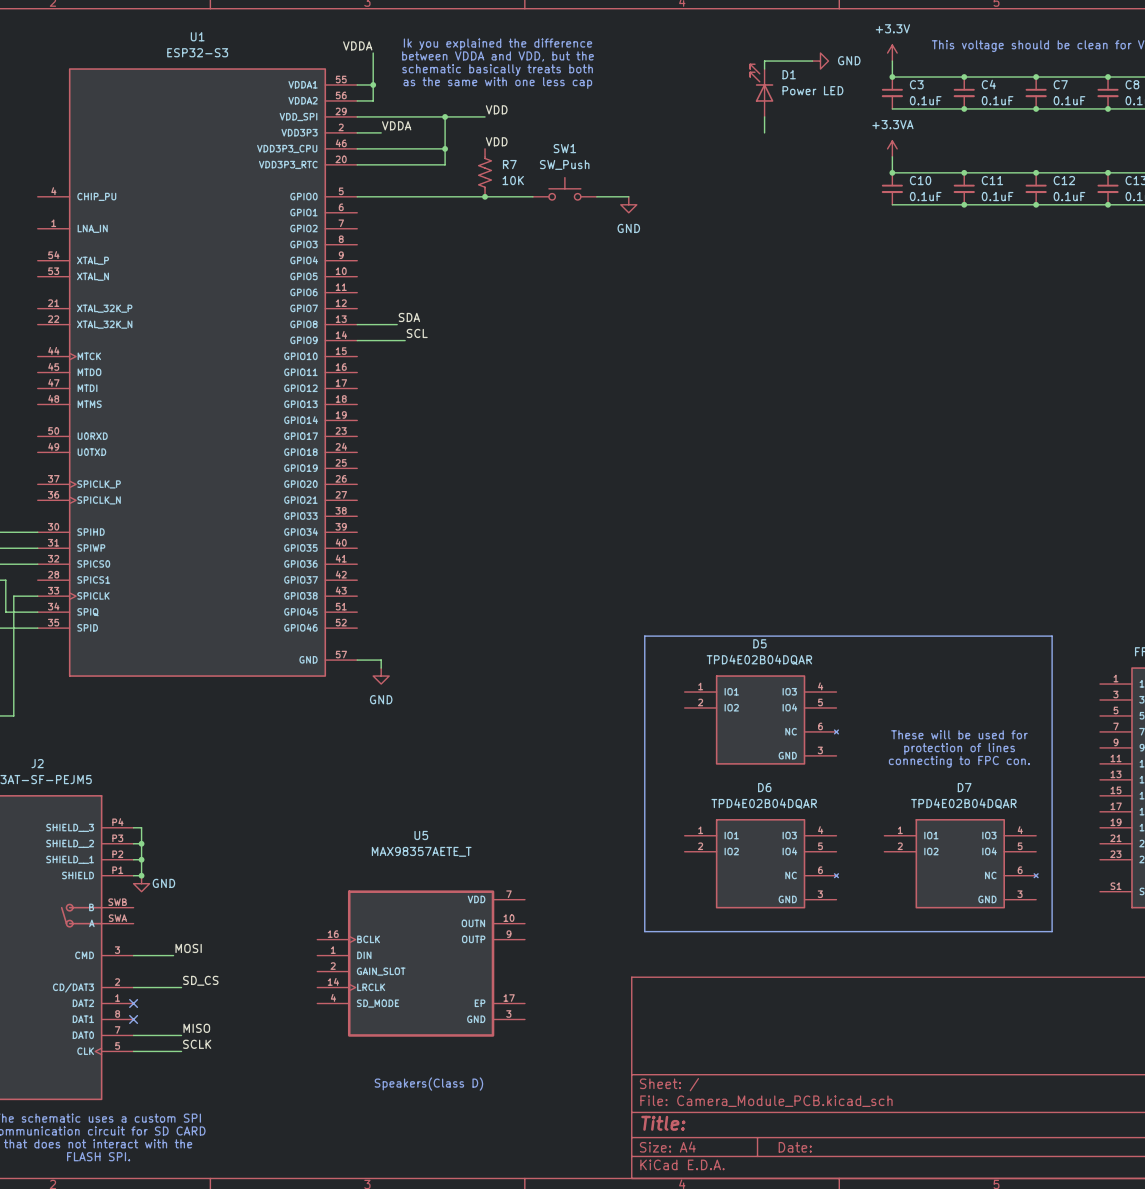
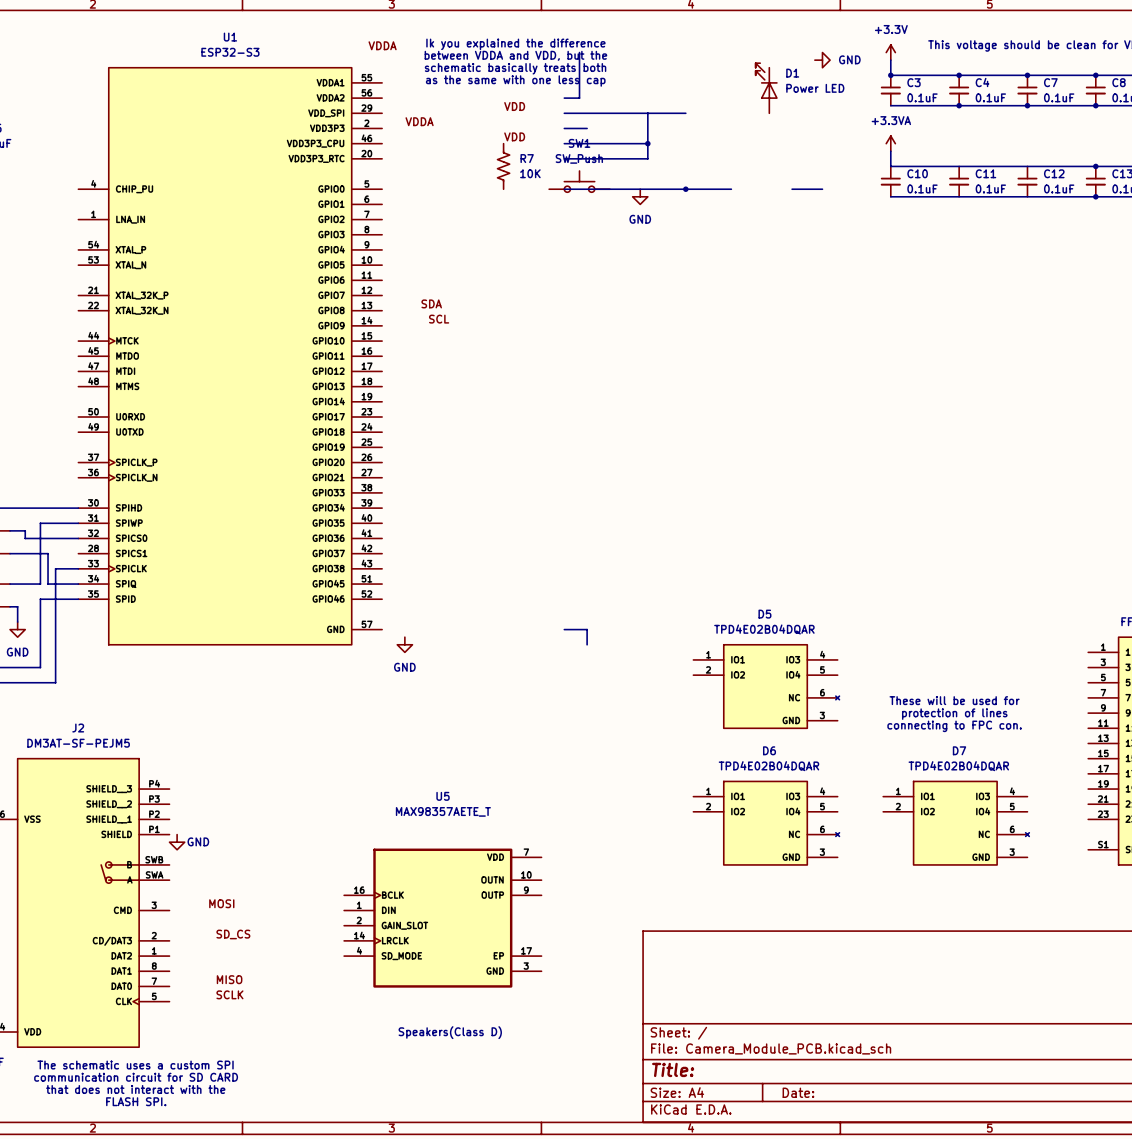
wire: (373, 53) (373, 100) (357, 100) -> none
wire: none -> (579, 52) (579, 98) (564, 98)
wire: (812, 61) (764, 61) (764, 69) -> none
wire: (357, 84) (373, 84) -> none
junction: (373, 84) -> none
wire: (357, 116) (485, 116) -> none
wire: (445, 116) (445, 164) (357, 164) -> none
junction: (445, 116) -> none
wire: none -> (564, 113) (685, 113)
wire: none -> (647, 113) (647, 158) (564, 158)
wire: (764, 116) (764, 132) -> none
wire: (357, 132) (381, 132) -> none
wire: none -> (564, 128) (587, 128)
wire: (357, 148) (445, 148) -> none
junction: (445, 148) -> none
wire: none -> (564, 143) (647, 143)
junction: none -> (647, 143)
junction: (892, 172) -> none
junction: (964, 172) -> none
junction: (1036, 172) -> none
wire: (357, 196) (532, 196) -> none
junction: (485, 196) -> none
wire: none -> (564, 189) (609, 189)
wire: none -> (640, 189) (731, 189)
junction: none -> (685, 189)
wire: none -> (792, 189) (822, 189)
junction: (964, 204) -> none
junction: (1036, 204) -> none
wire: (357, 324) (397, 324) -> none
wire: (357, 340) (405, 340) -> none
line: (644, 636) (1052, 636) (1052, 931) (644, 931) (644, 636) -> none
wire: (357, 660) (381, 660) (381, 668) -> none
wire: none -> (564, 629) (587, 629) (587, 644)
wire: (133, 827) (141, 827) (141, 875) (133, 875) -> none
wire: (133, 843) (141, 843) -> none
junction: (141, 843) -> none
wire: (133, 859) (141, 859) -> none
junction: (141, 859) -> none
junction: (141, 875) -> none
wire: (133, 955) (173, 955) -> none
wire: (133, 987) (181, 987) -> none
no-connect mark: (133, 1003) -> none
no-connect mark: (133, 1019) -> none
wire: (133, 1035) (181, 1035) -> none
wire: (133, 1051) (181, 1051) -> none

